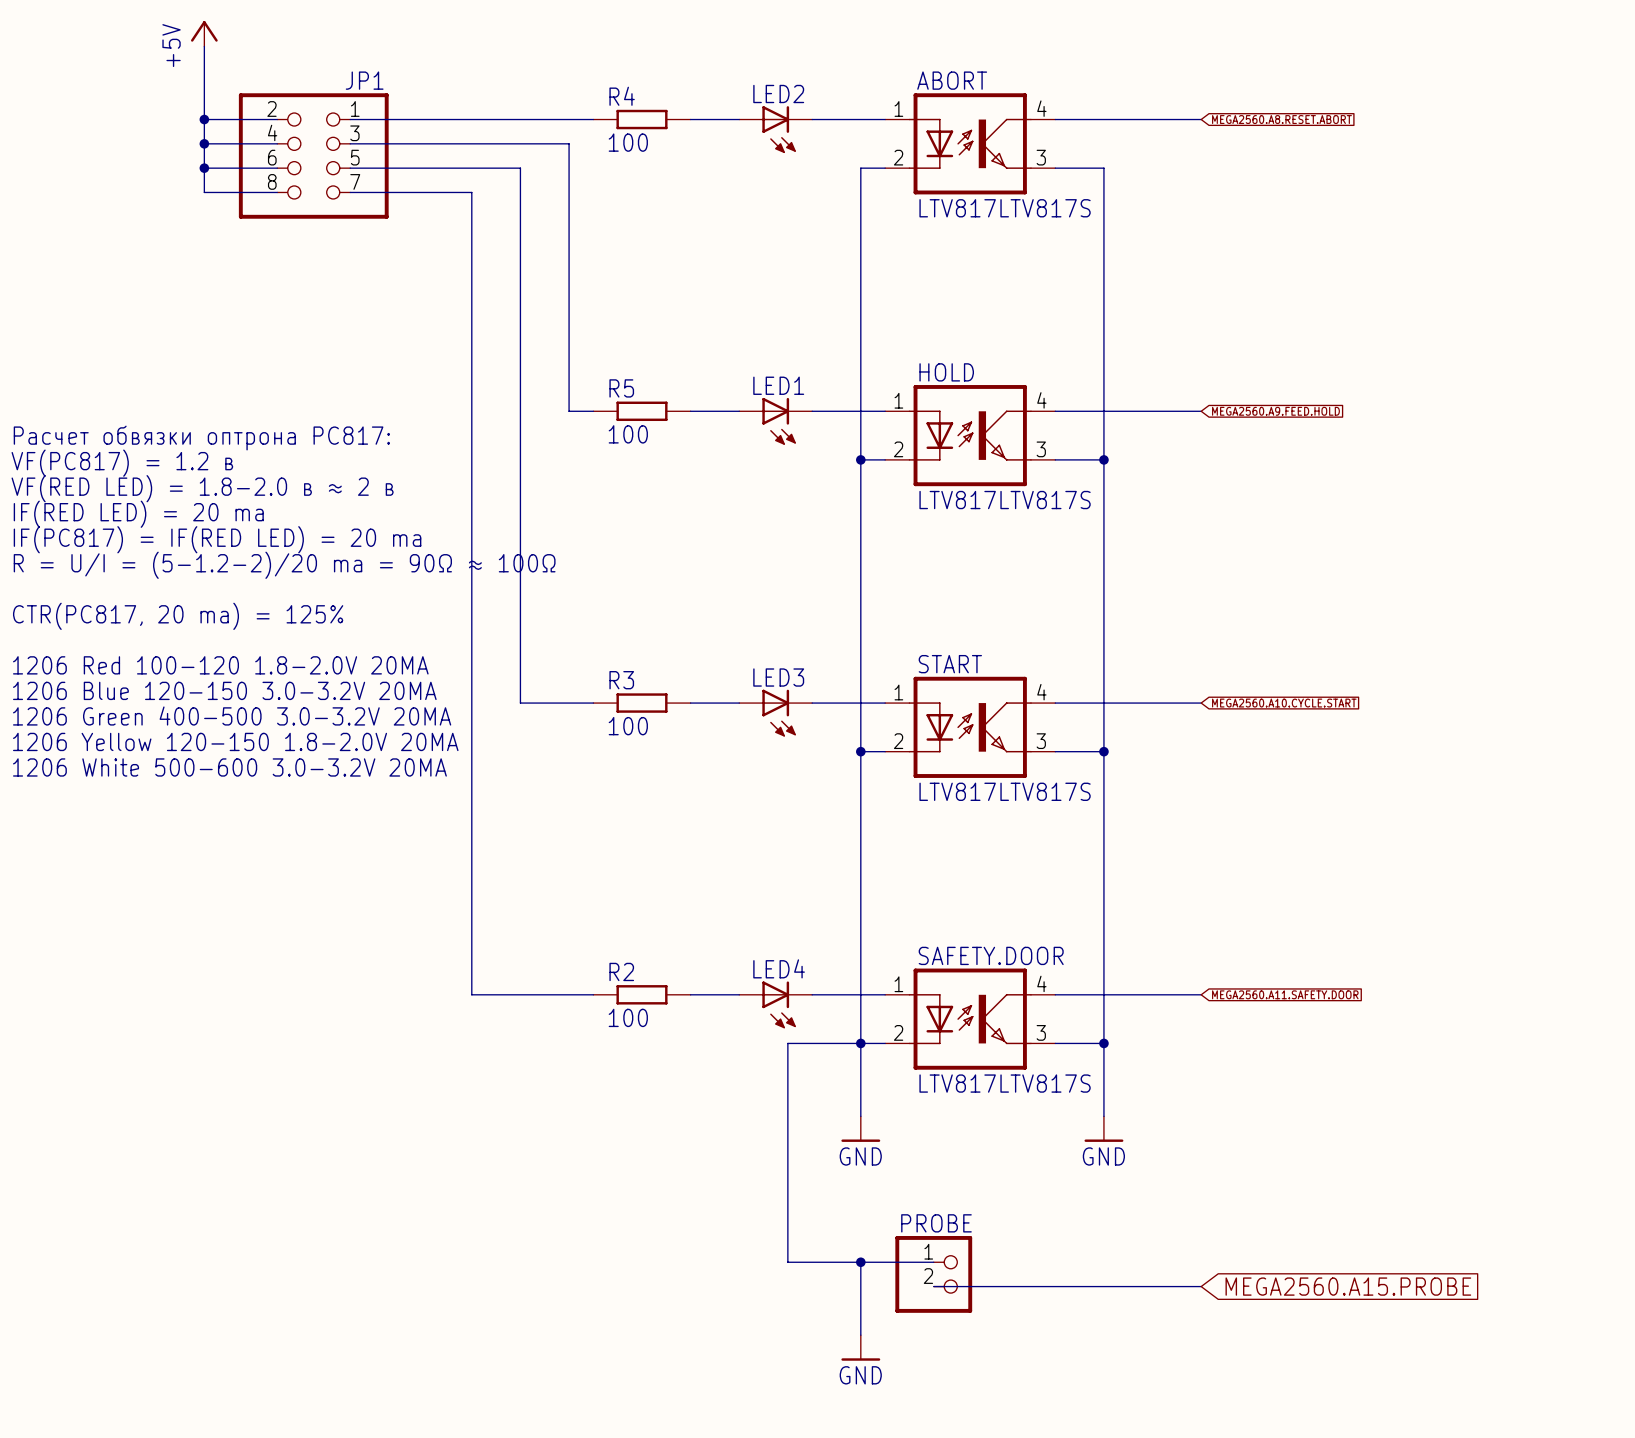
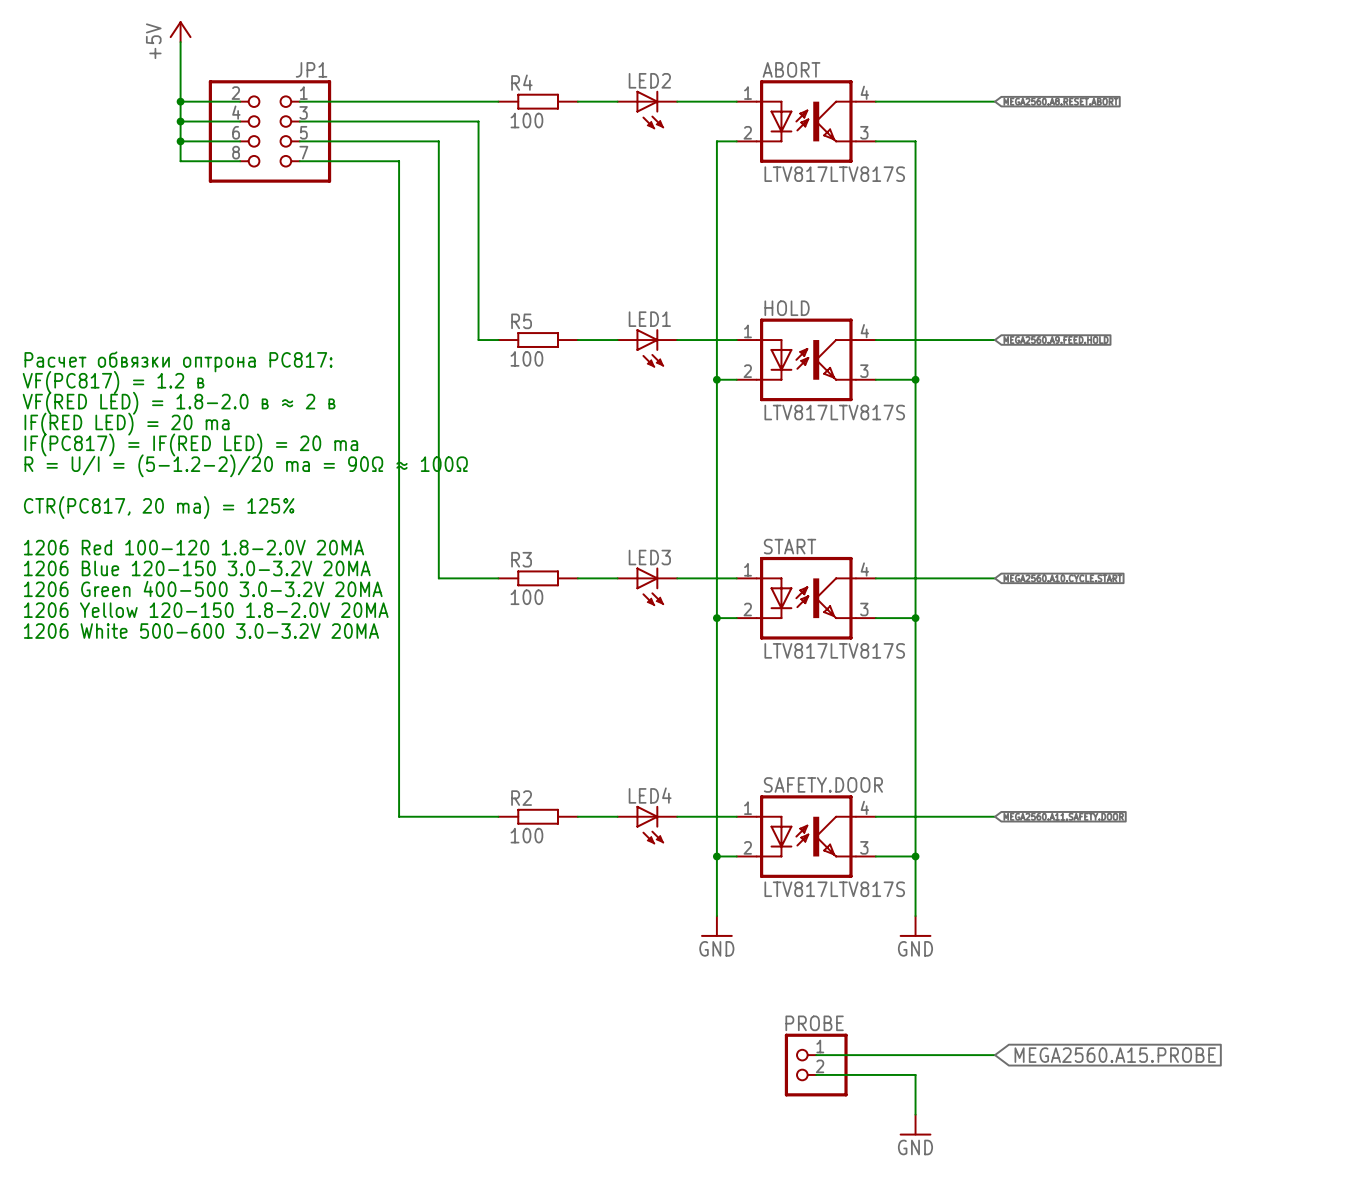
wire: (860, 1043) (787, 1043) (787, 1262) (933, 1262) -> none
wire: (860, 1262) (860, 1335) -> none
junction: (860, 1262) -> none
PROBE: (933, 1274) -> none
wire: (933, 1286) (982, 1286) -> none
PROBE: none -> (816, 1065)
wire: none -> (816, 1074) (915, 1074) (915, 1114)
power symbol: GND (860, 1347) -> none
power symbol: none -> GND (915, 1125)

